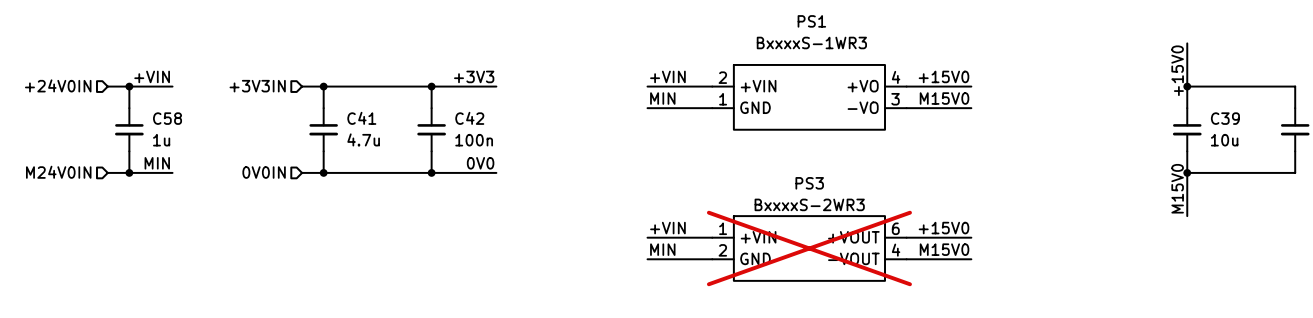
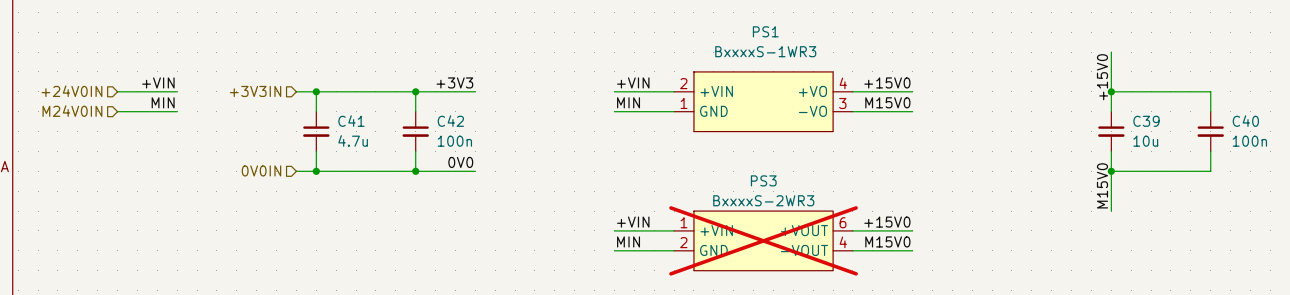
wire: (129, 86) (129, 108) -> none
junction: (129, 86) -> none
C58: 1u (129, 129) -> none
wire: (129, 151) (129, 172) -> none
label position: MIN (157, 163) -> MIN (163, 102)
hierarchical label position: M24V0IN (58, 172) -> M24V0IN (72, 111)
wire: (107, 172) (172, 172) -> (117, 111) (177, 111)
junction: (129, 172) -> none

